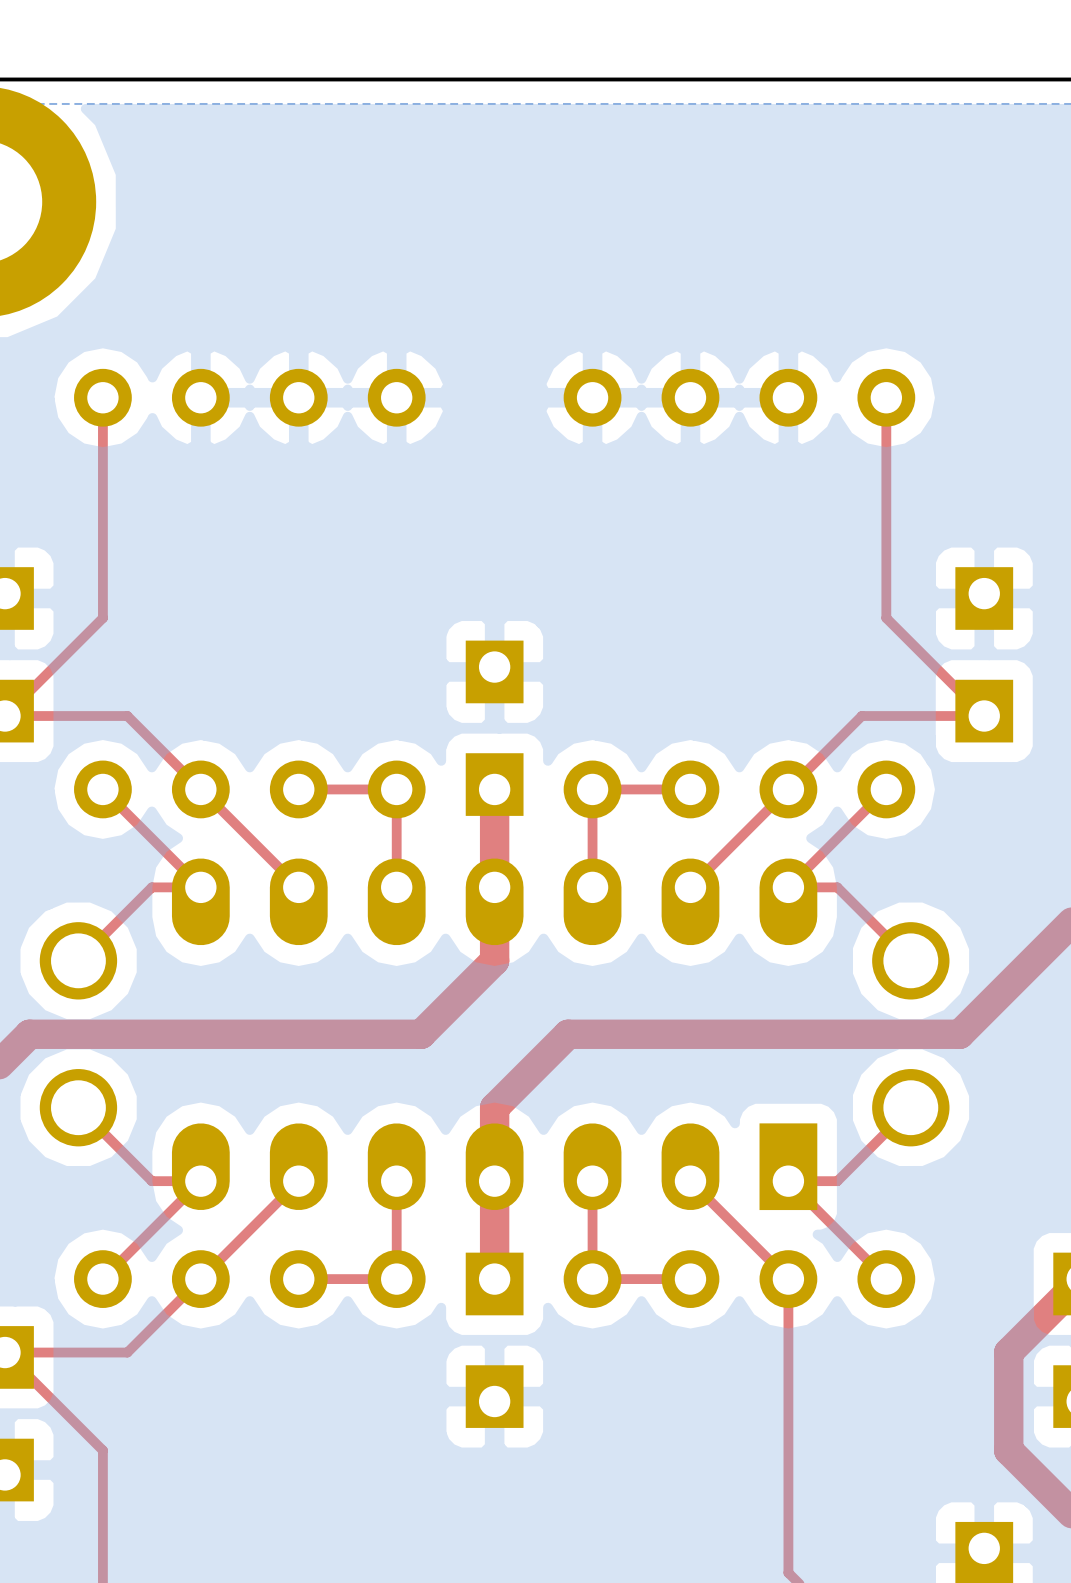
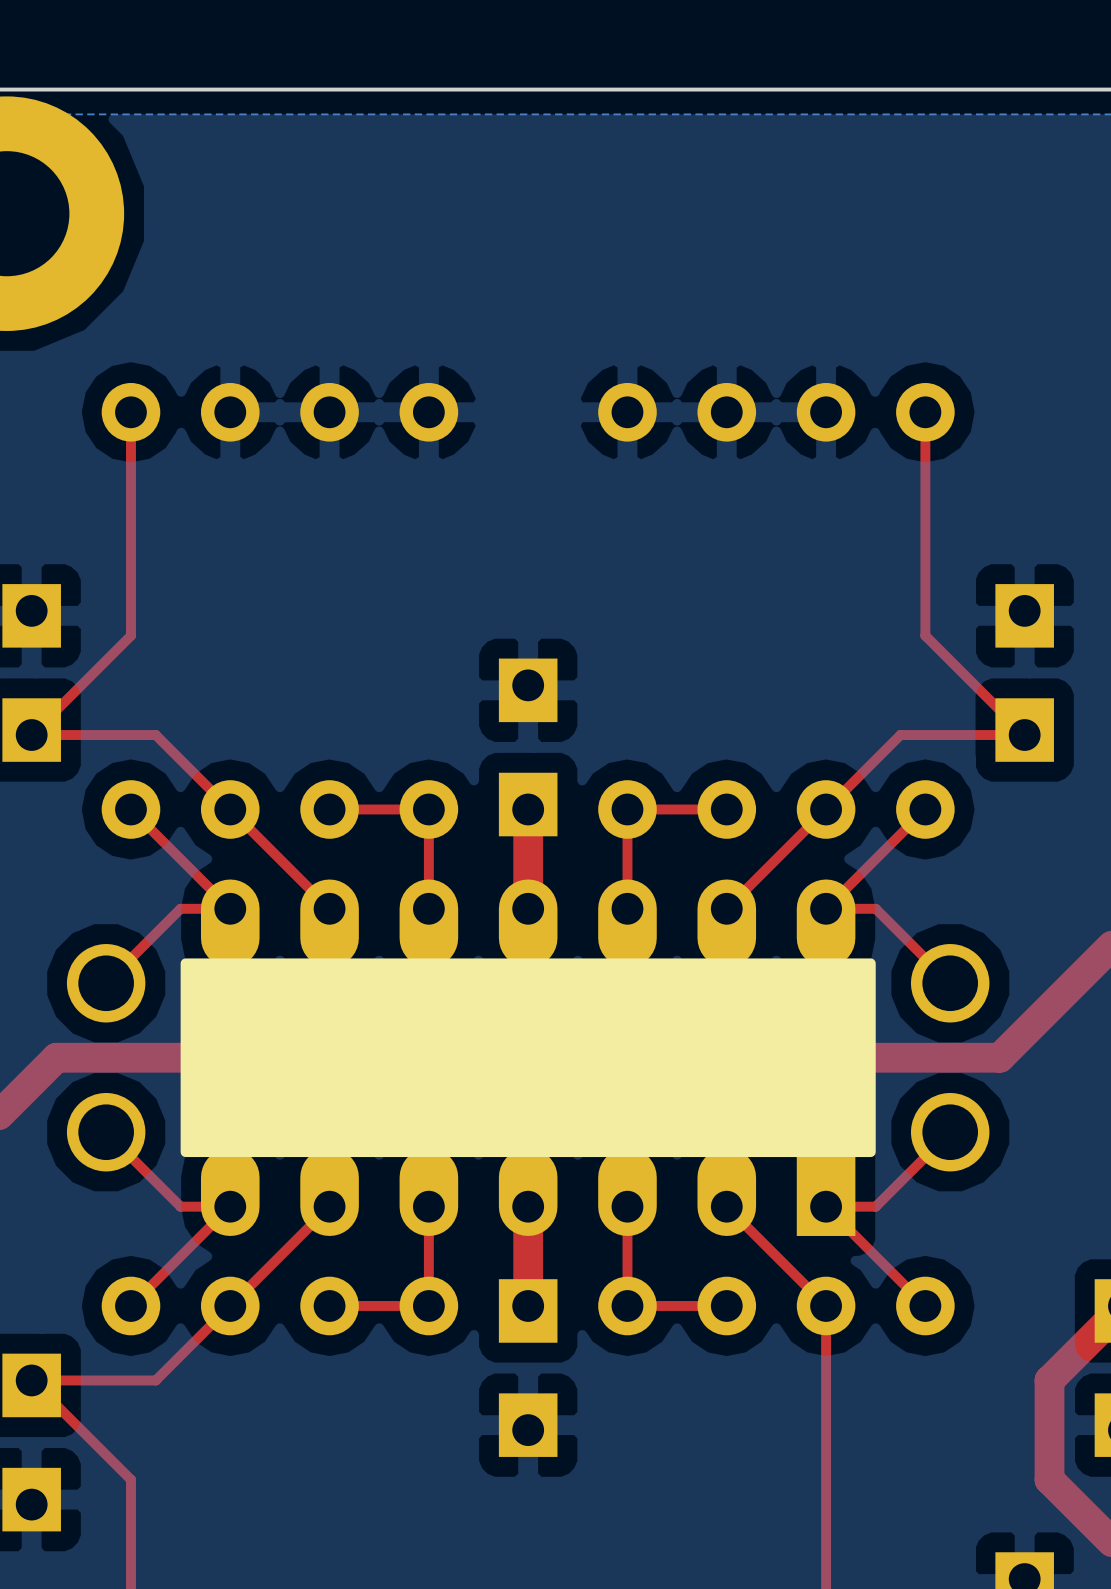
drawing: none -> [180, 958, 876, 1158]

